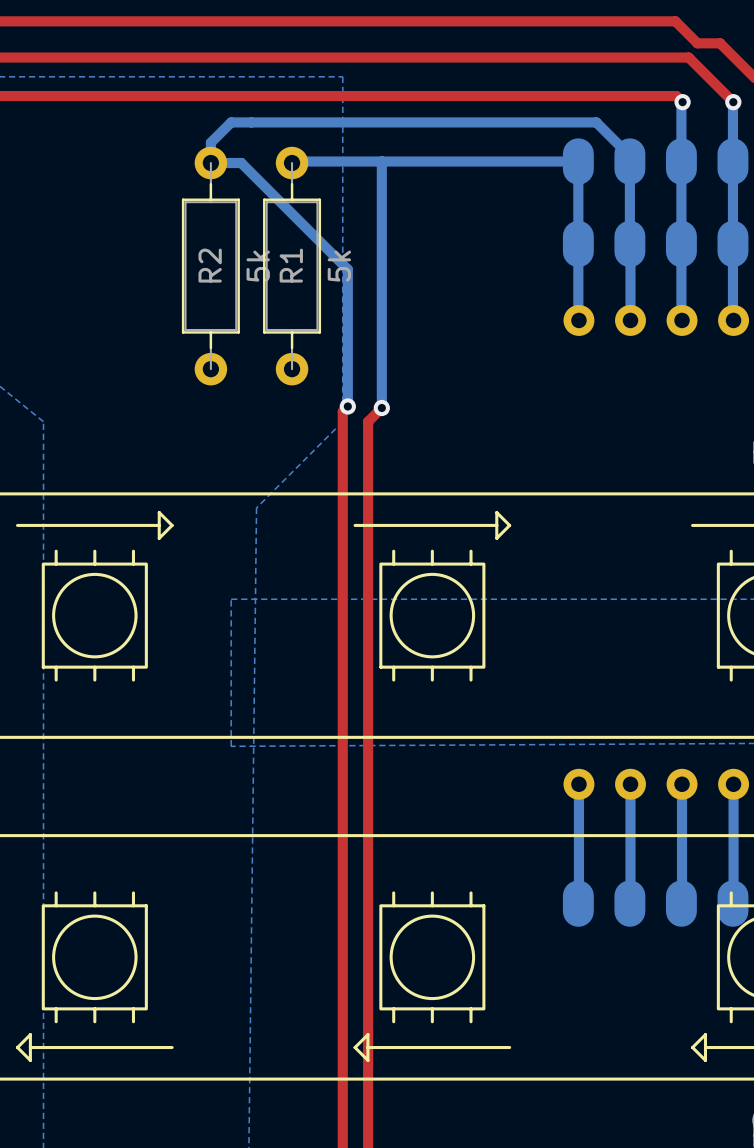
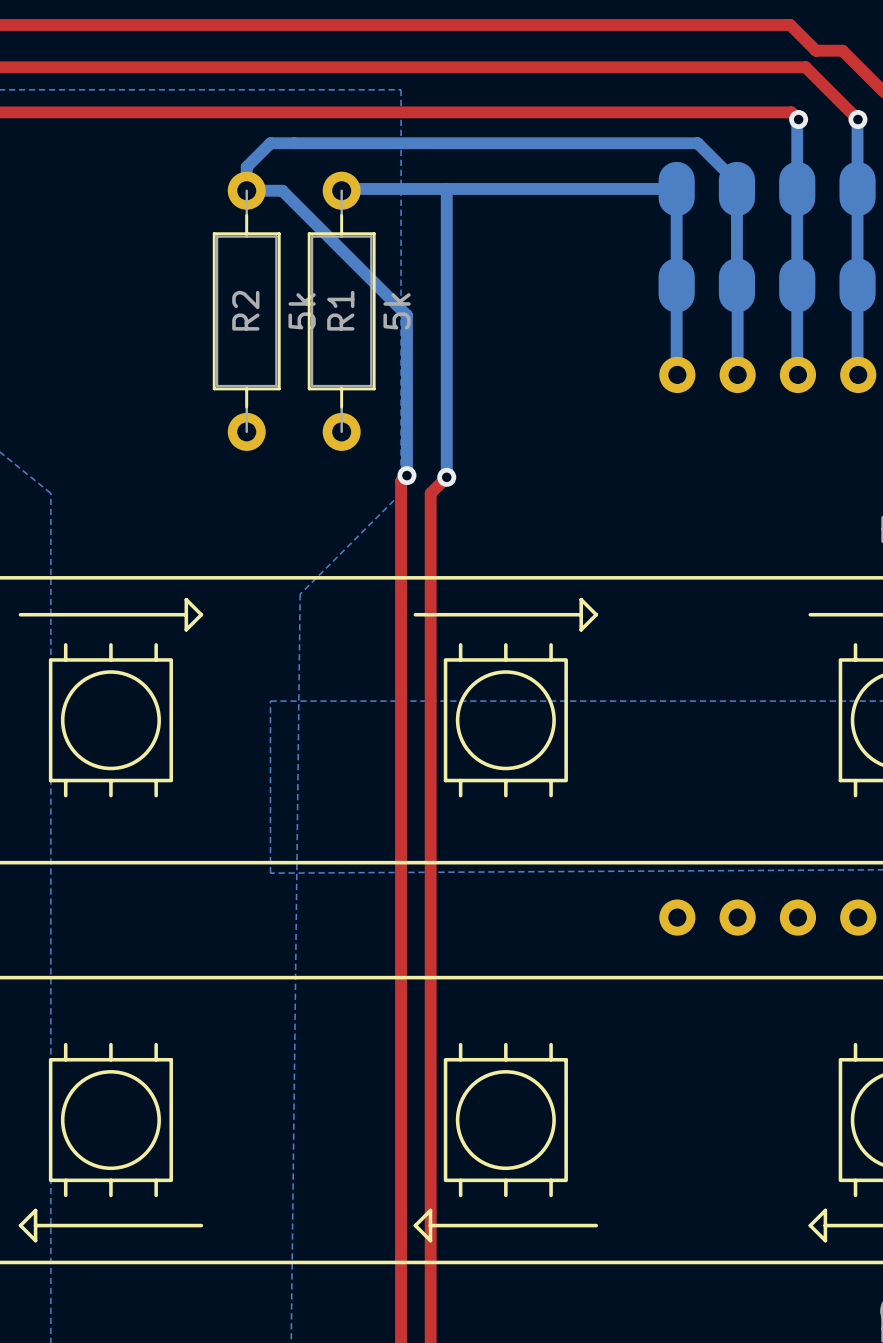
bottom track: (578, 784) (578, 903) -> none
bottom track: (630, 784) (629, 903) -> none
bottom track: (682, 784) (681, 903) -> none
bottom track: (733, 784) (732, 903) -> none
part: (578, 903) -> none
part: (629, 903) -> none
part: (681, 903) -> none
part: (732, 903) -> none

